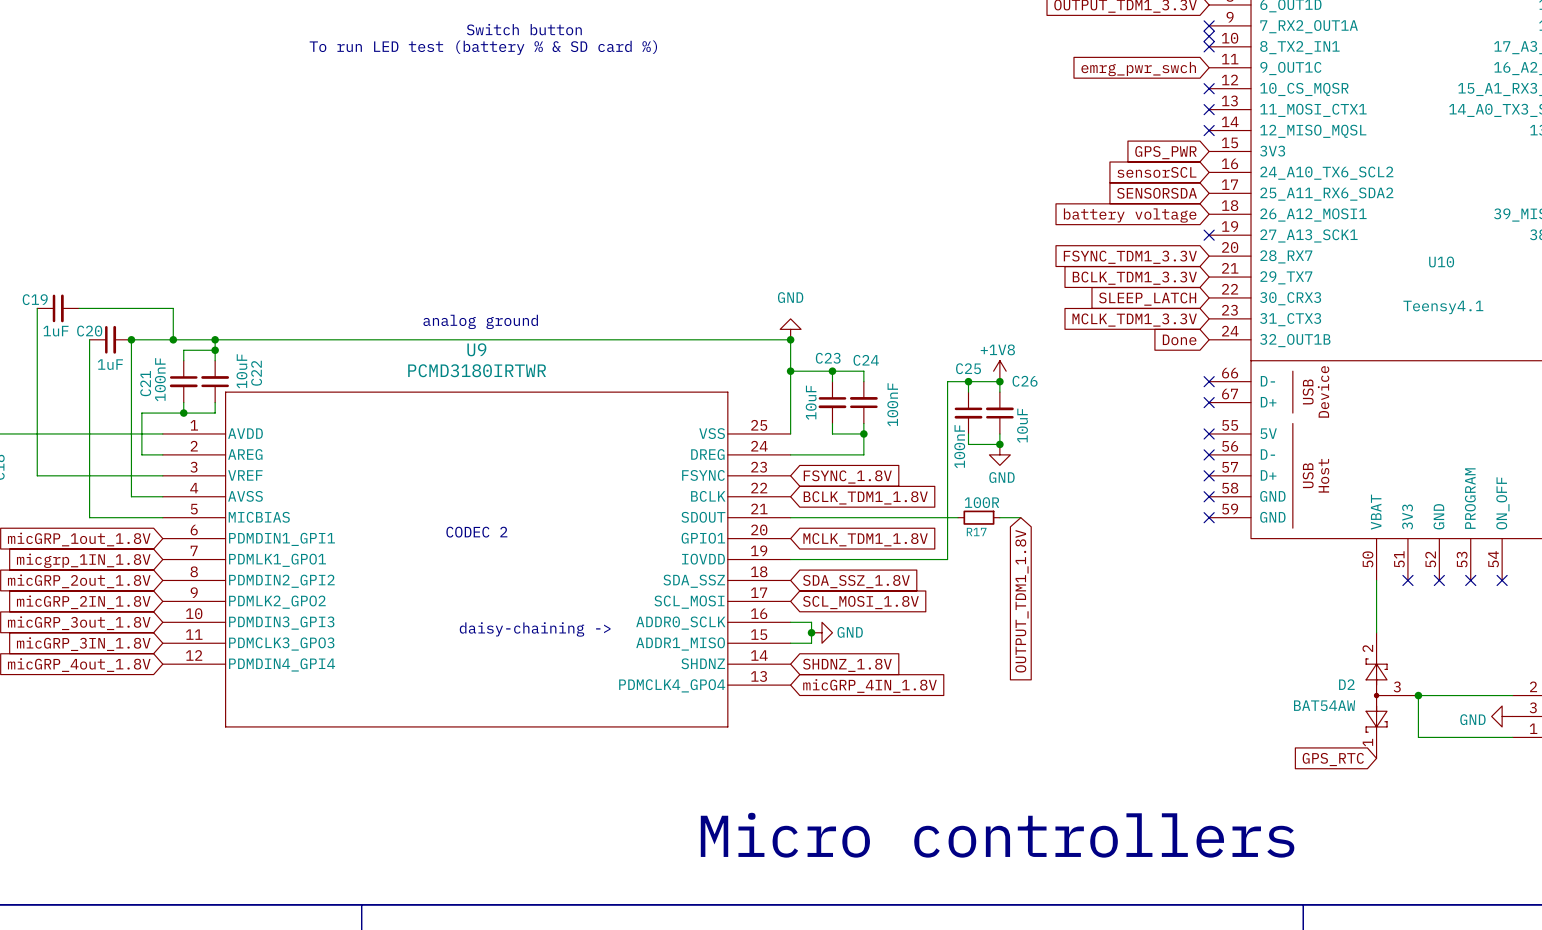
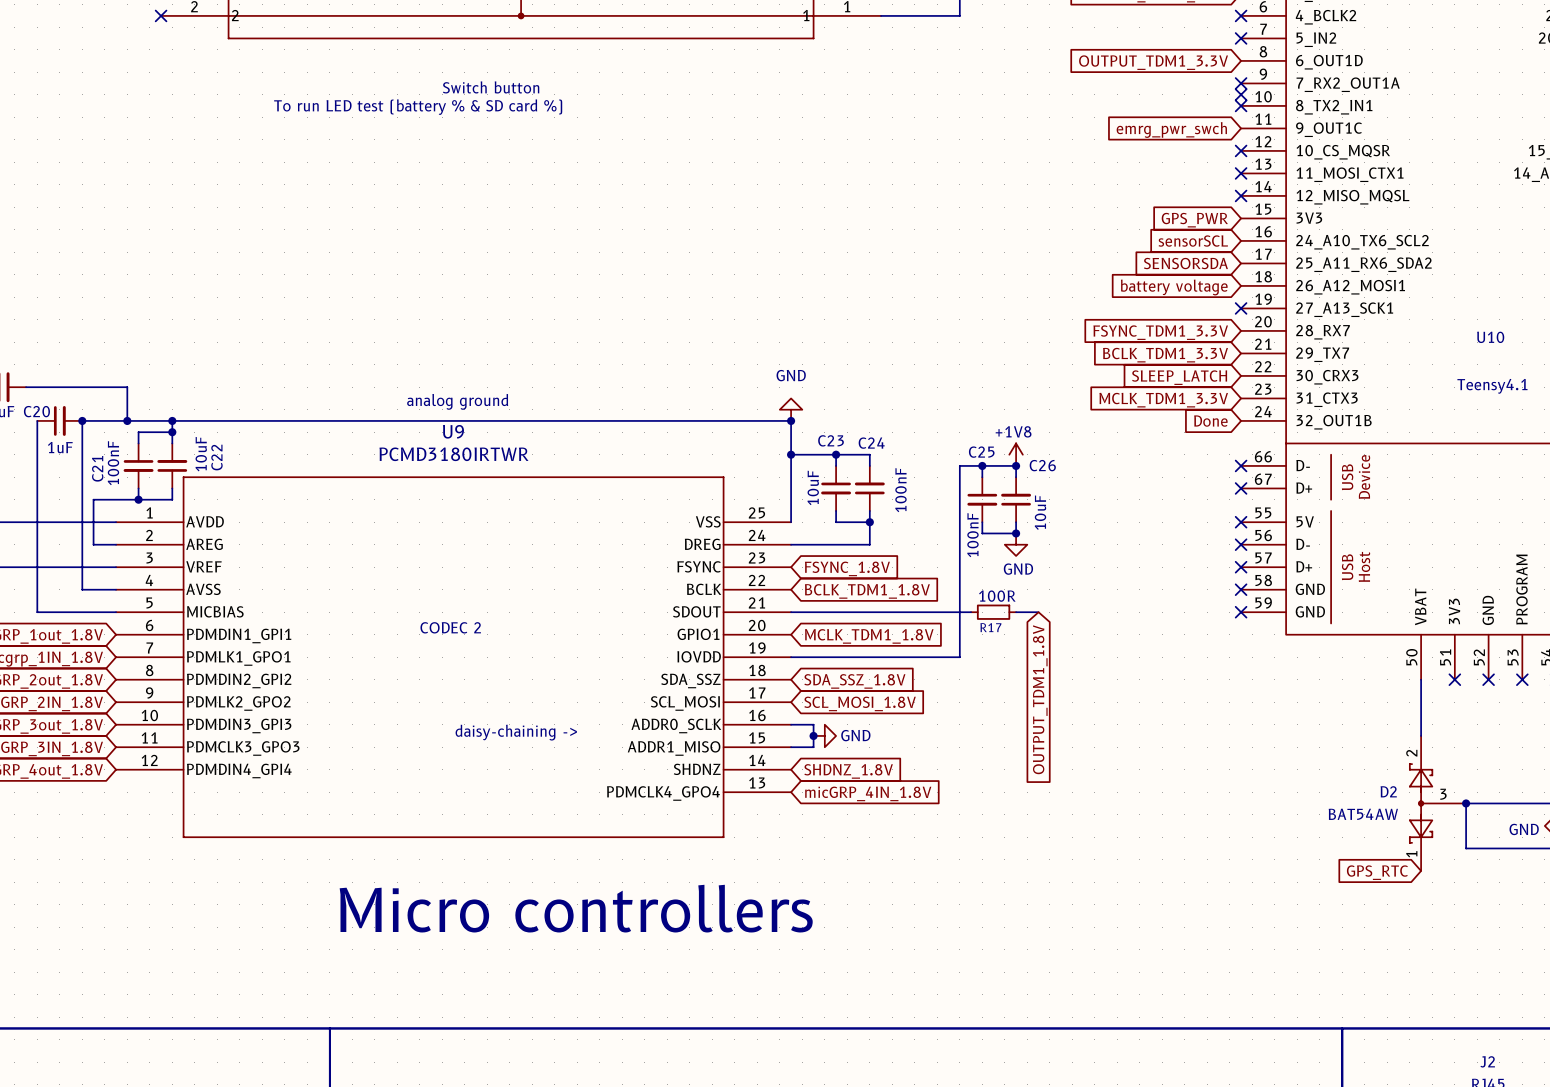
text: none -> Micro controllers (576, 908)
text: Micro controllers (997, 835) -> none

